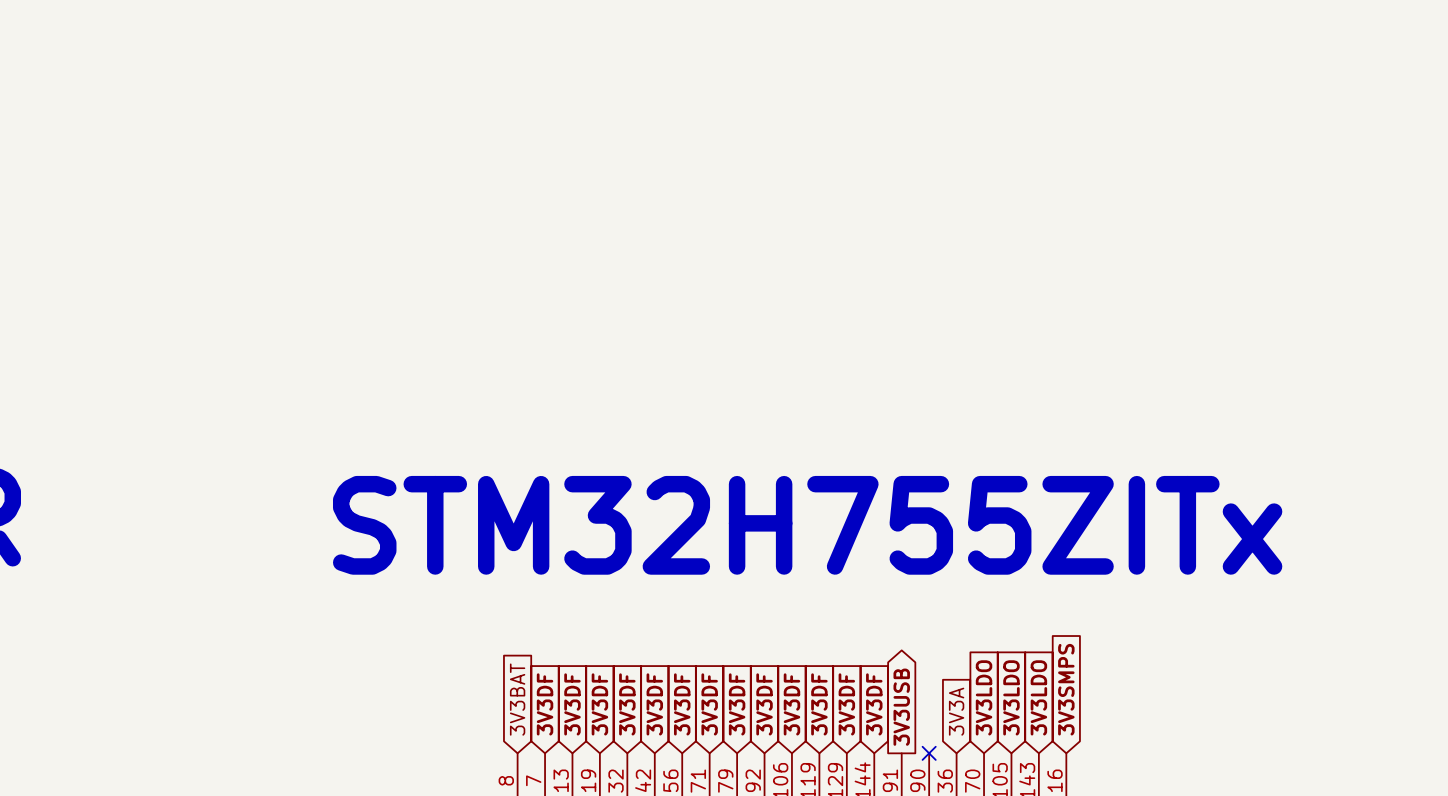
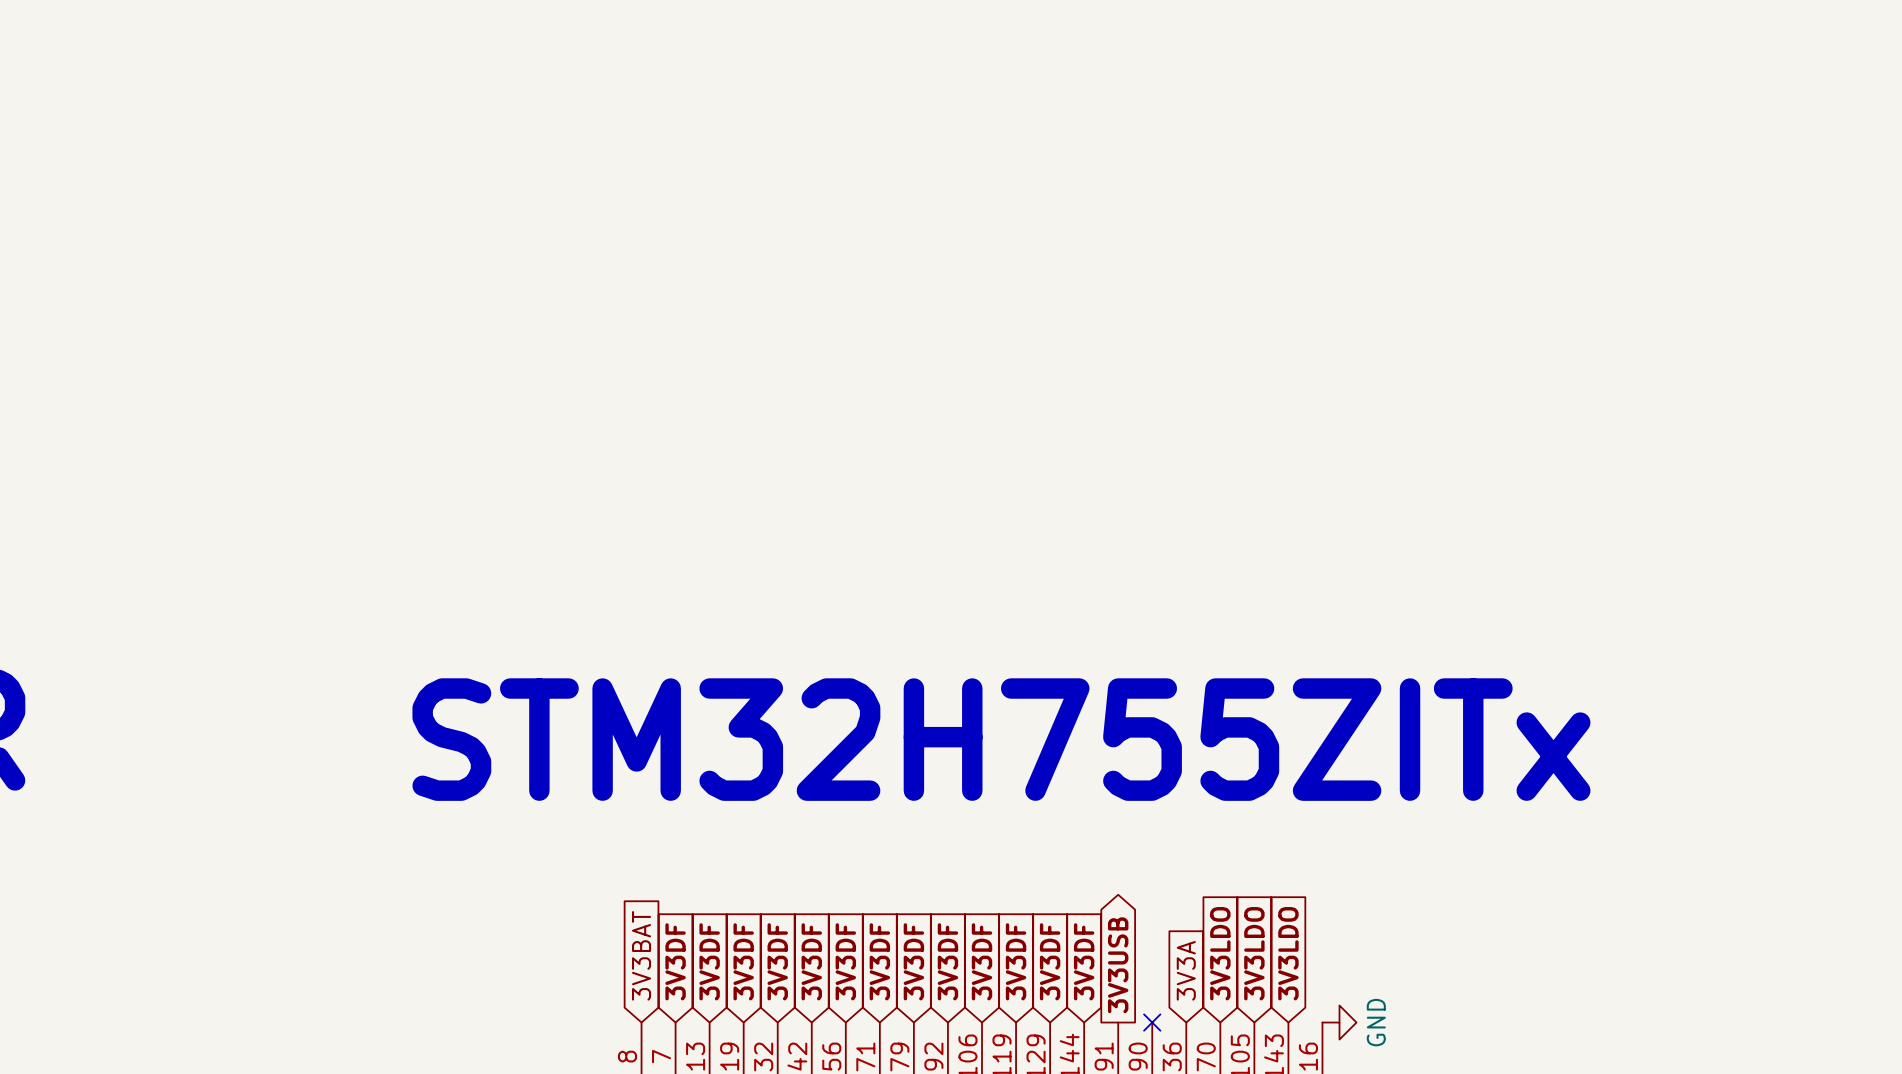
global label: 3V3SMPS (1066, 689) -> none
power symbol: none -> GND (1339, 1022)

